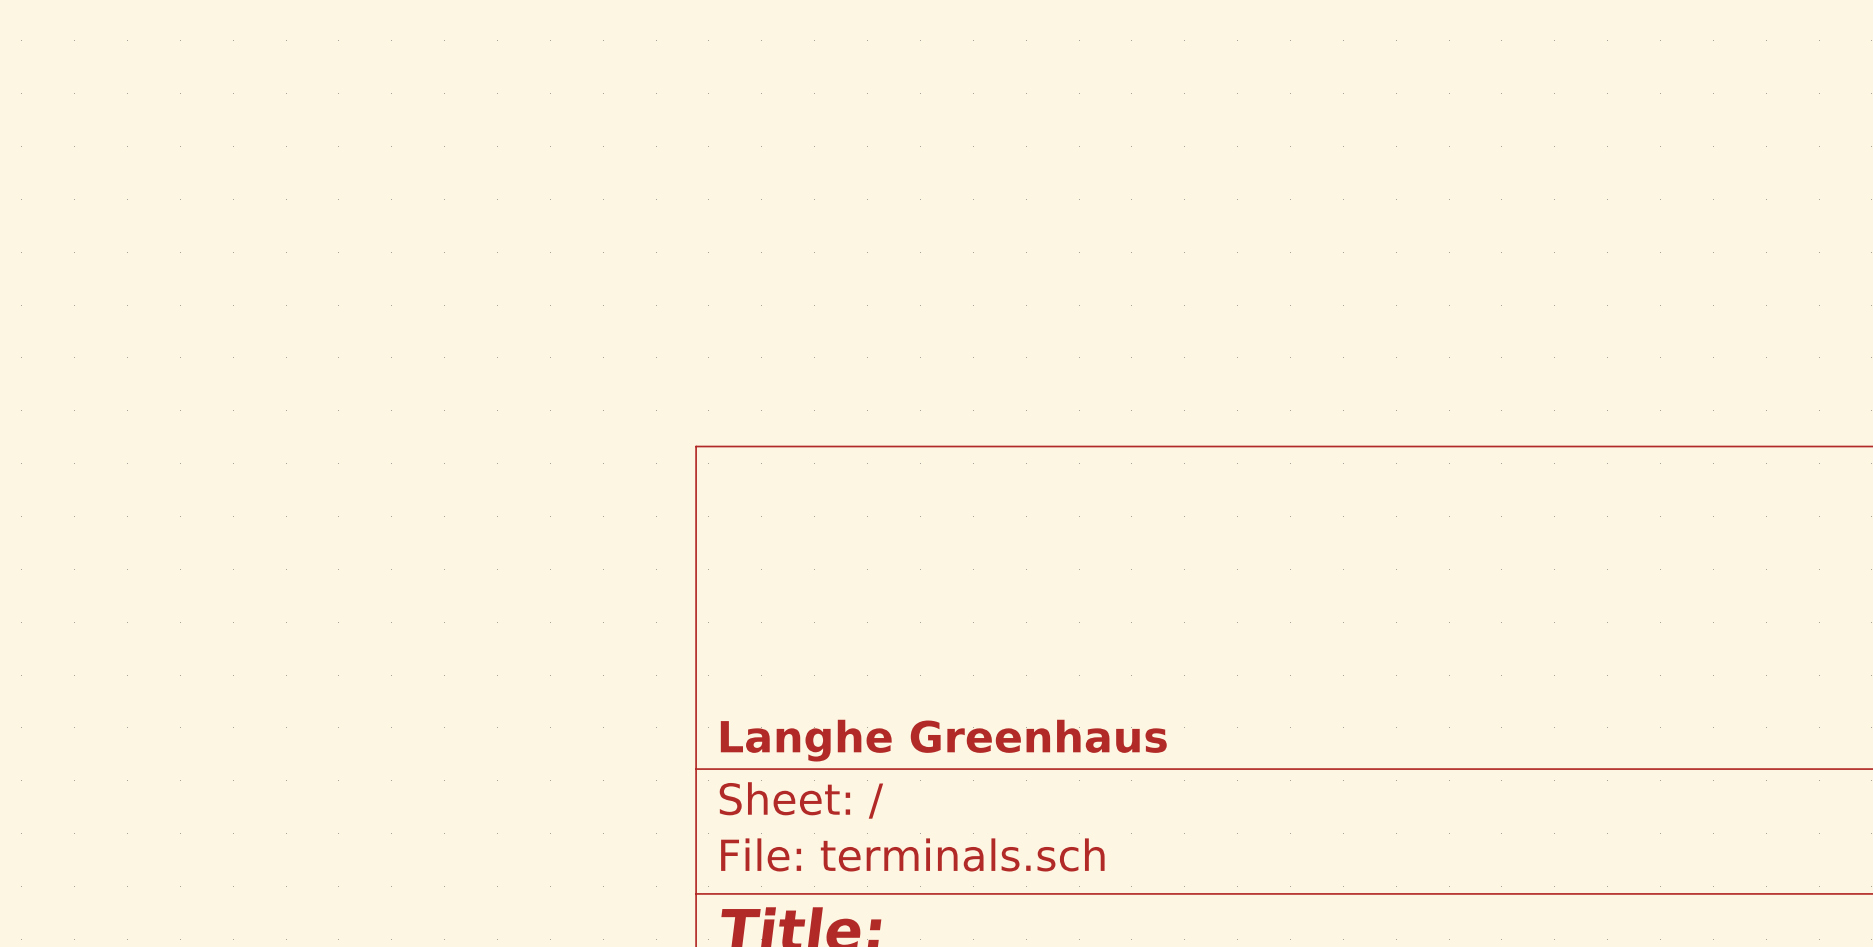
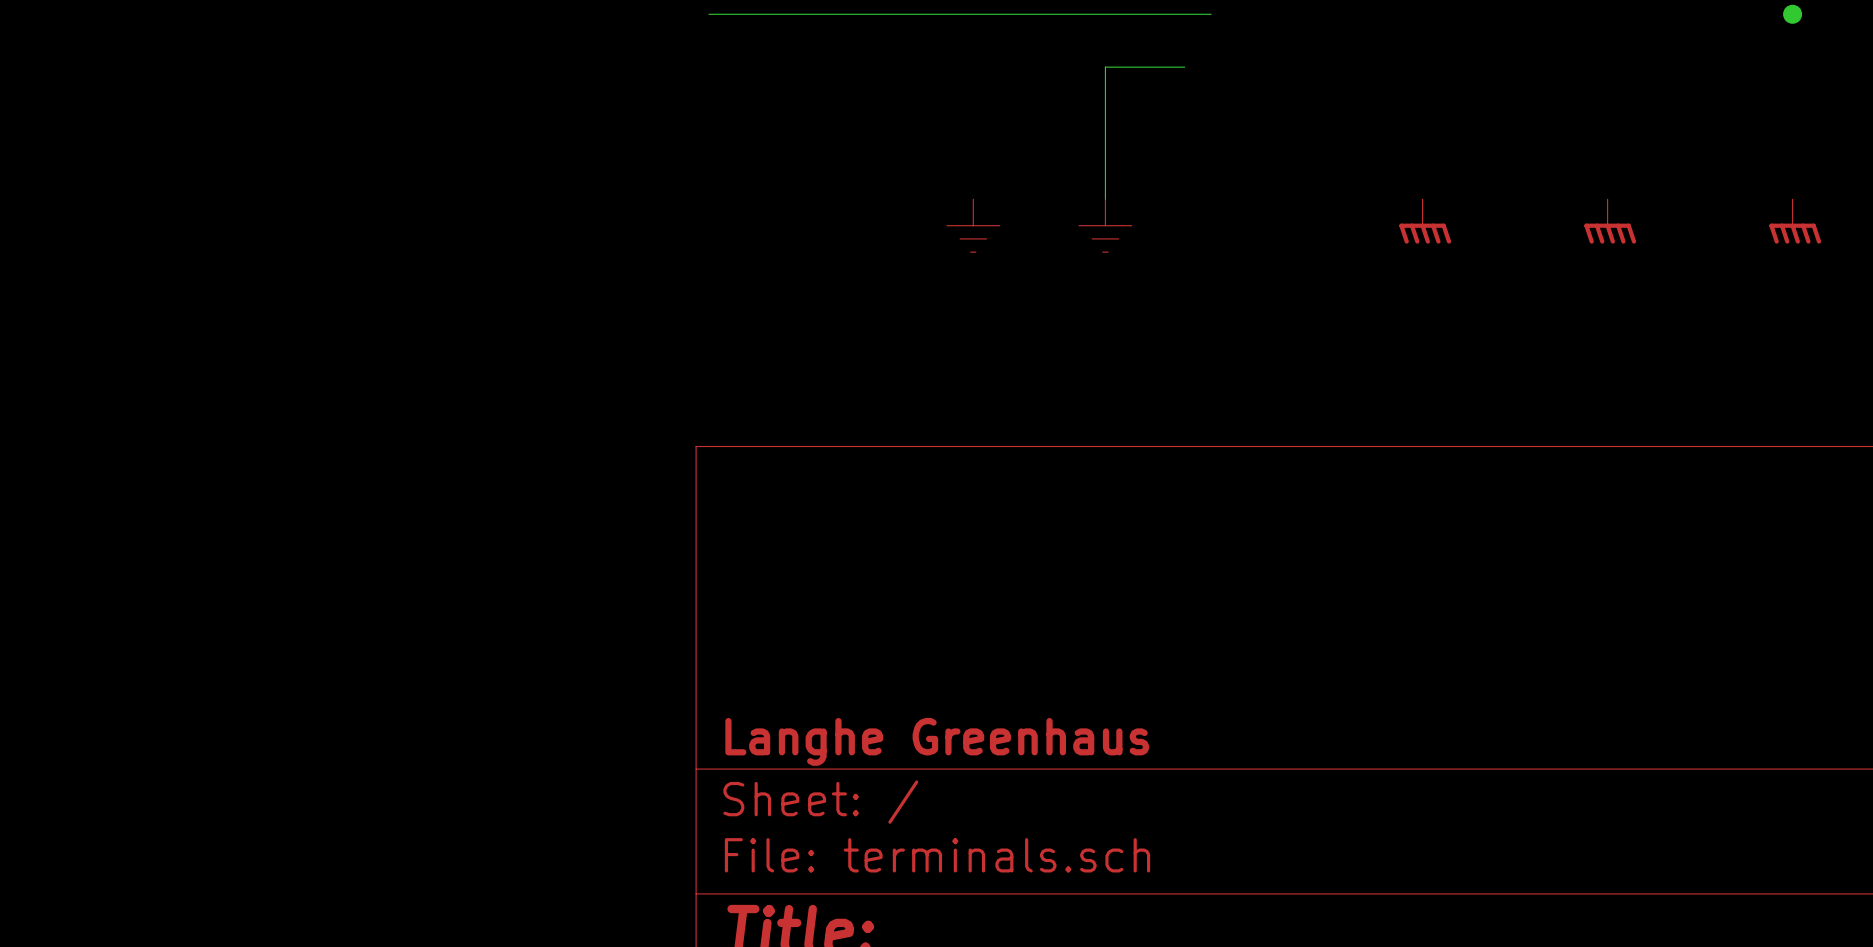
wire: none -> (708, 14) (1211, 14)
junction: none -> (1792, 14)
wire: none -> (1184, 67) (1105, 67) (1105, 199)
power symbol: none -> (1425, 221)
power symbol: none -> (1610, 221)
power symbol: none -> (1795, 221)
power symbol: none -> (973, 225)
power symbol: none -> (1105, 225)

